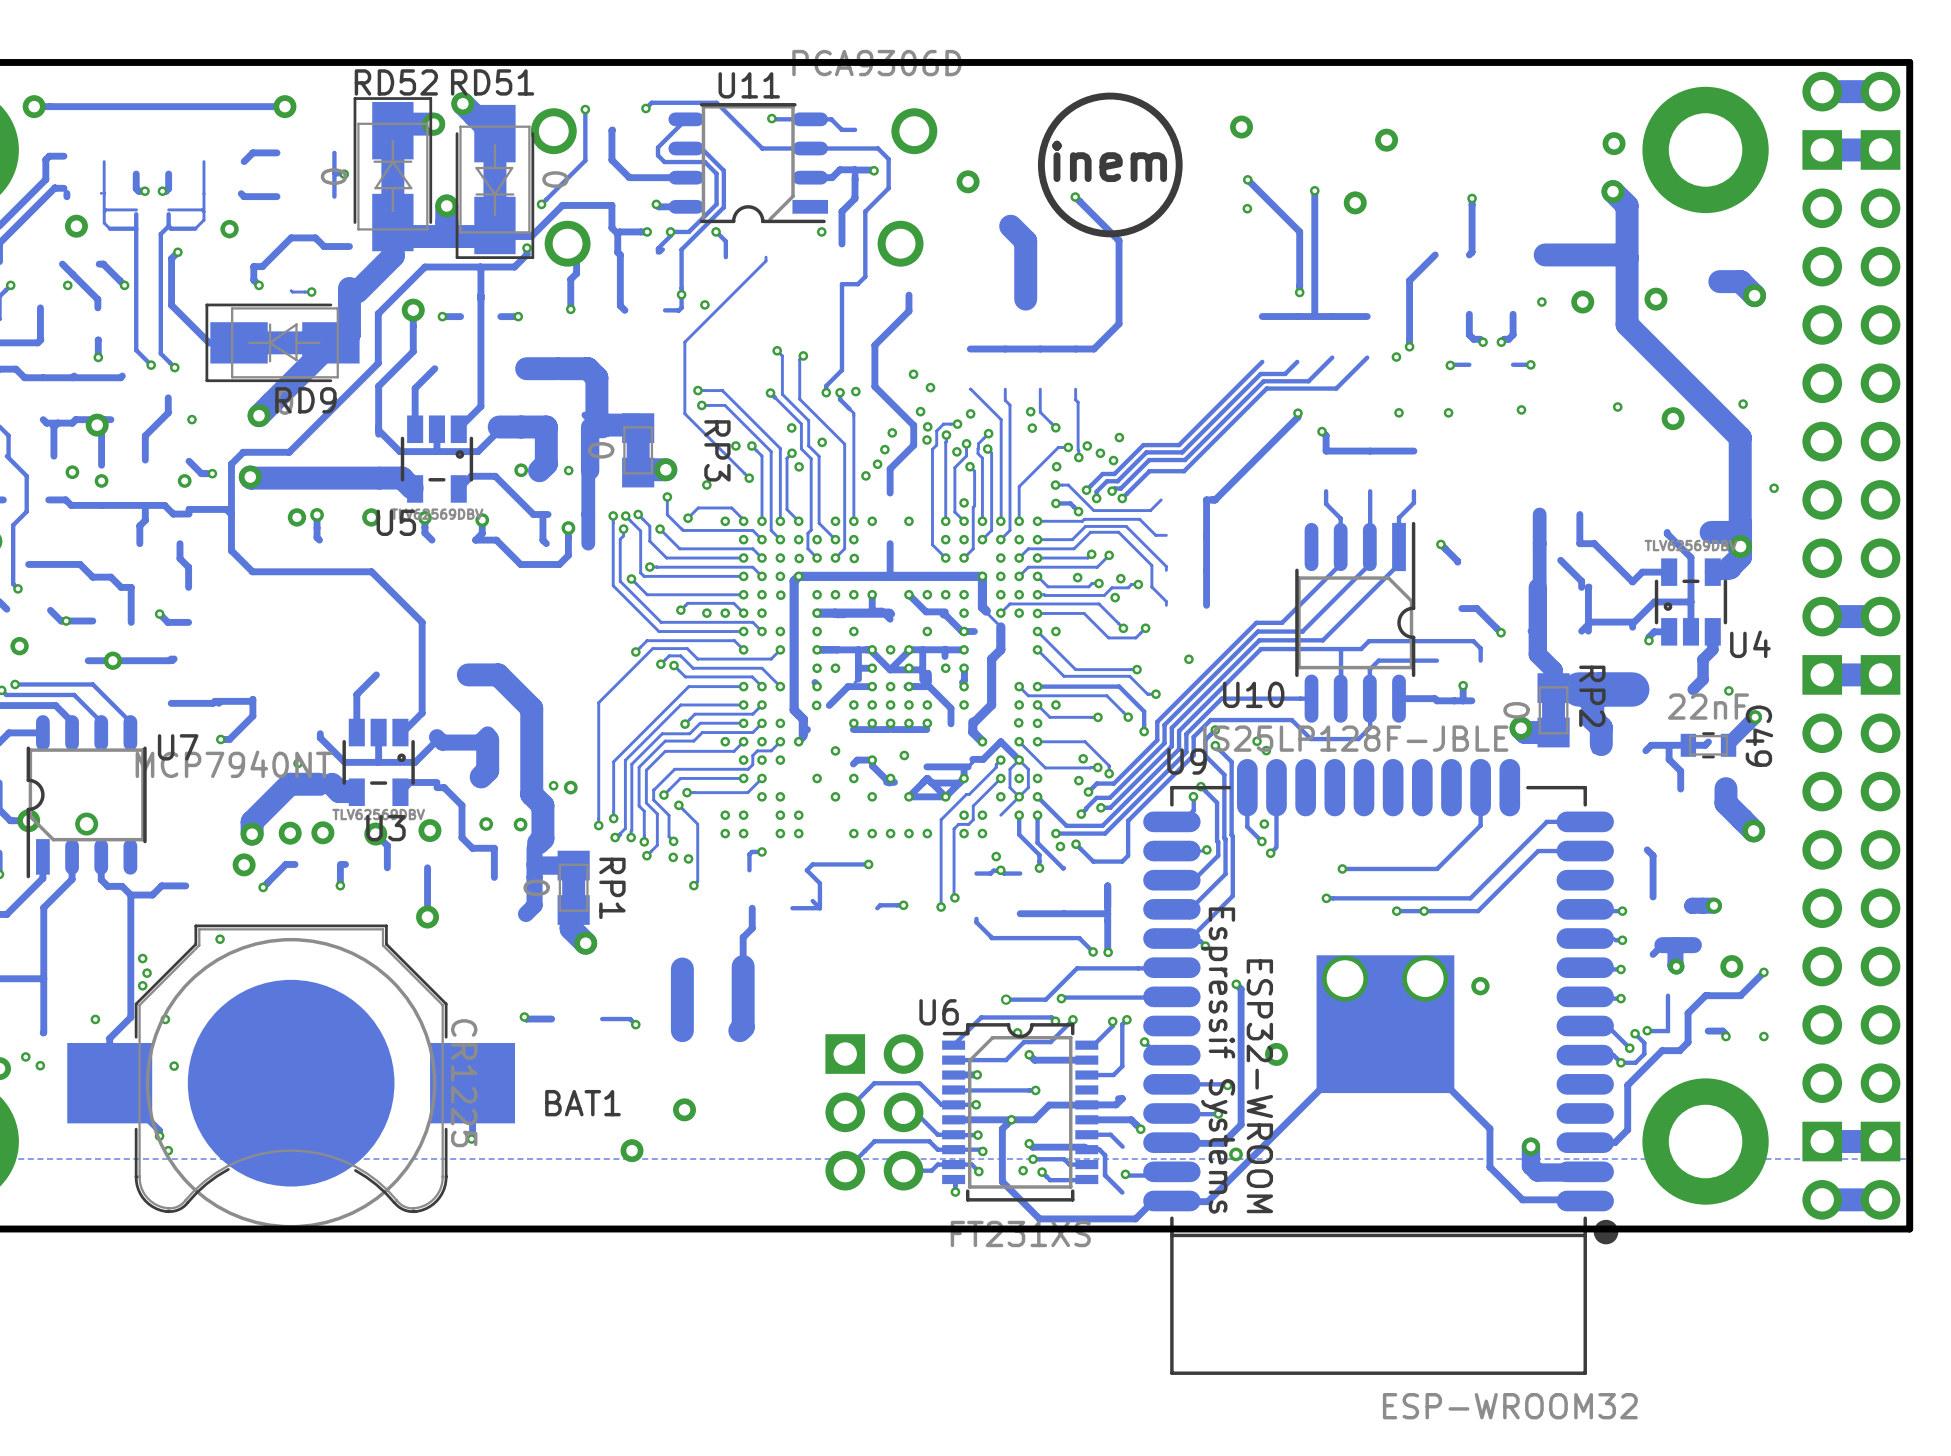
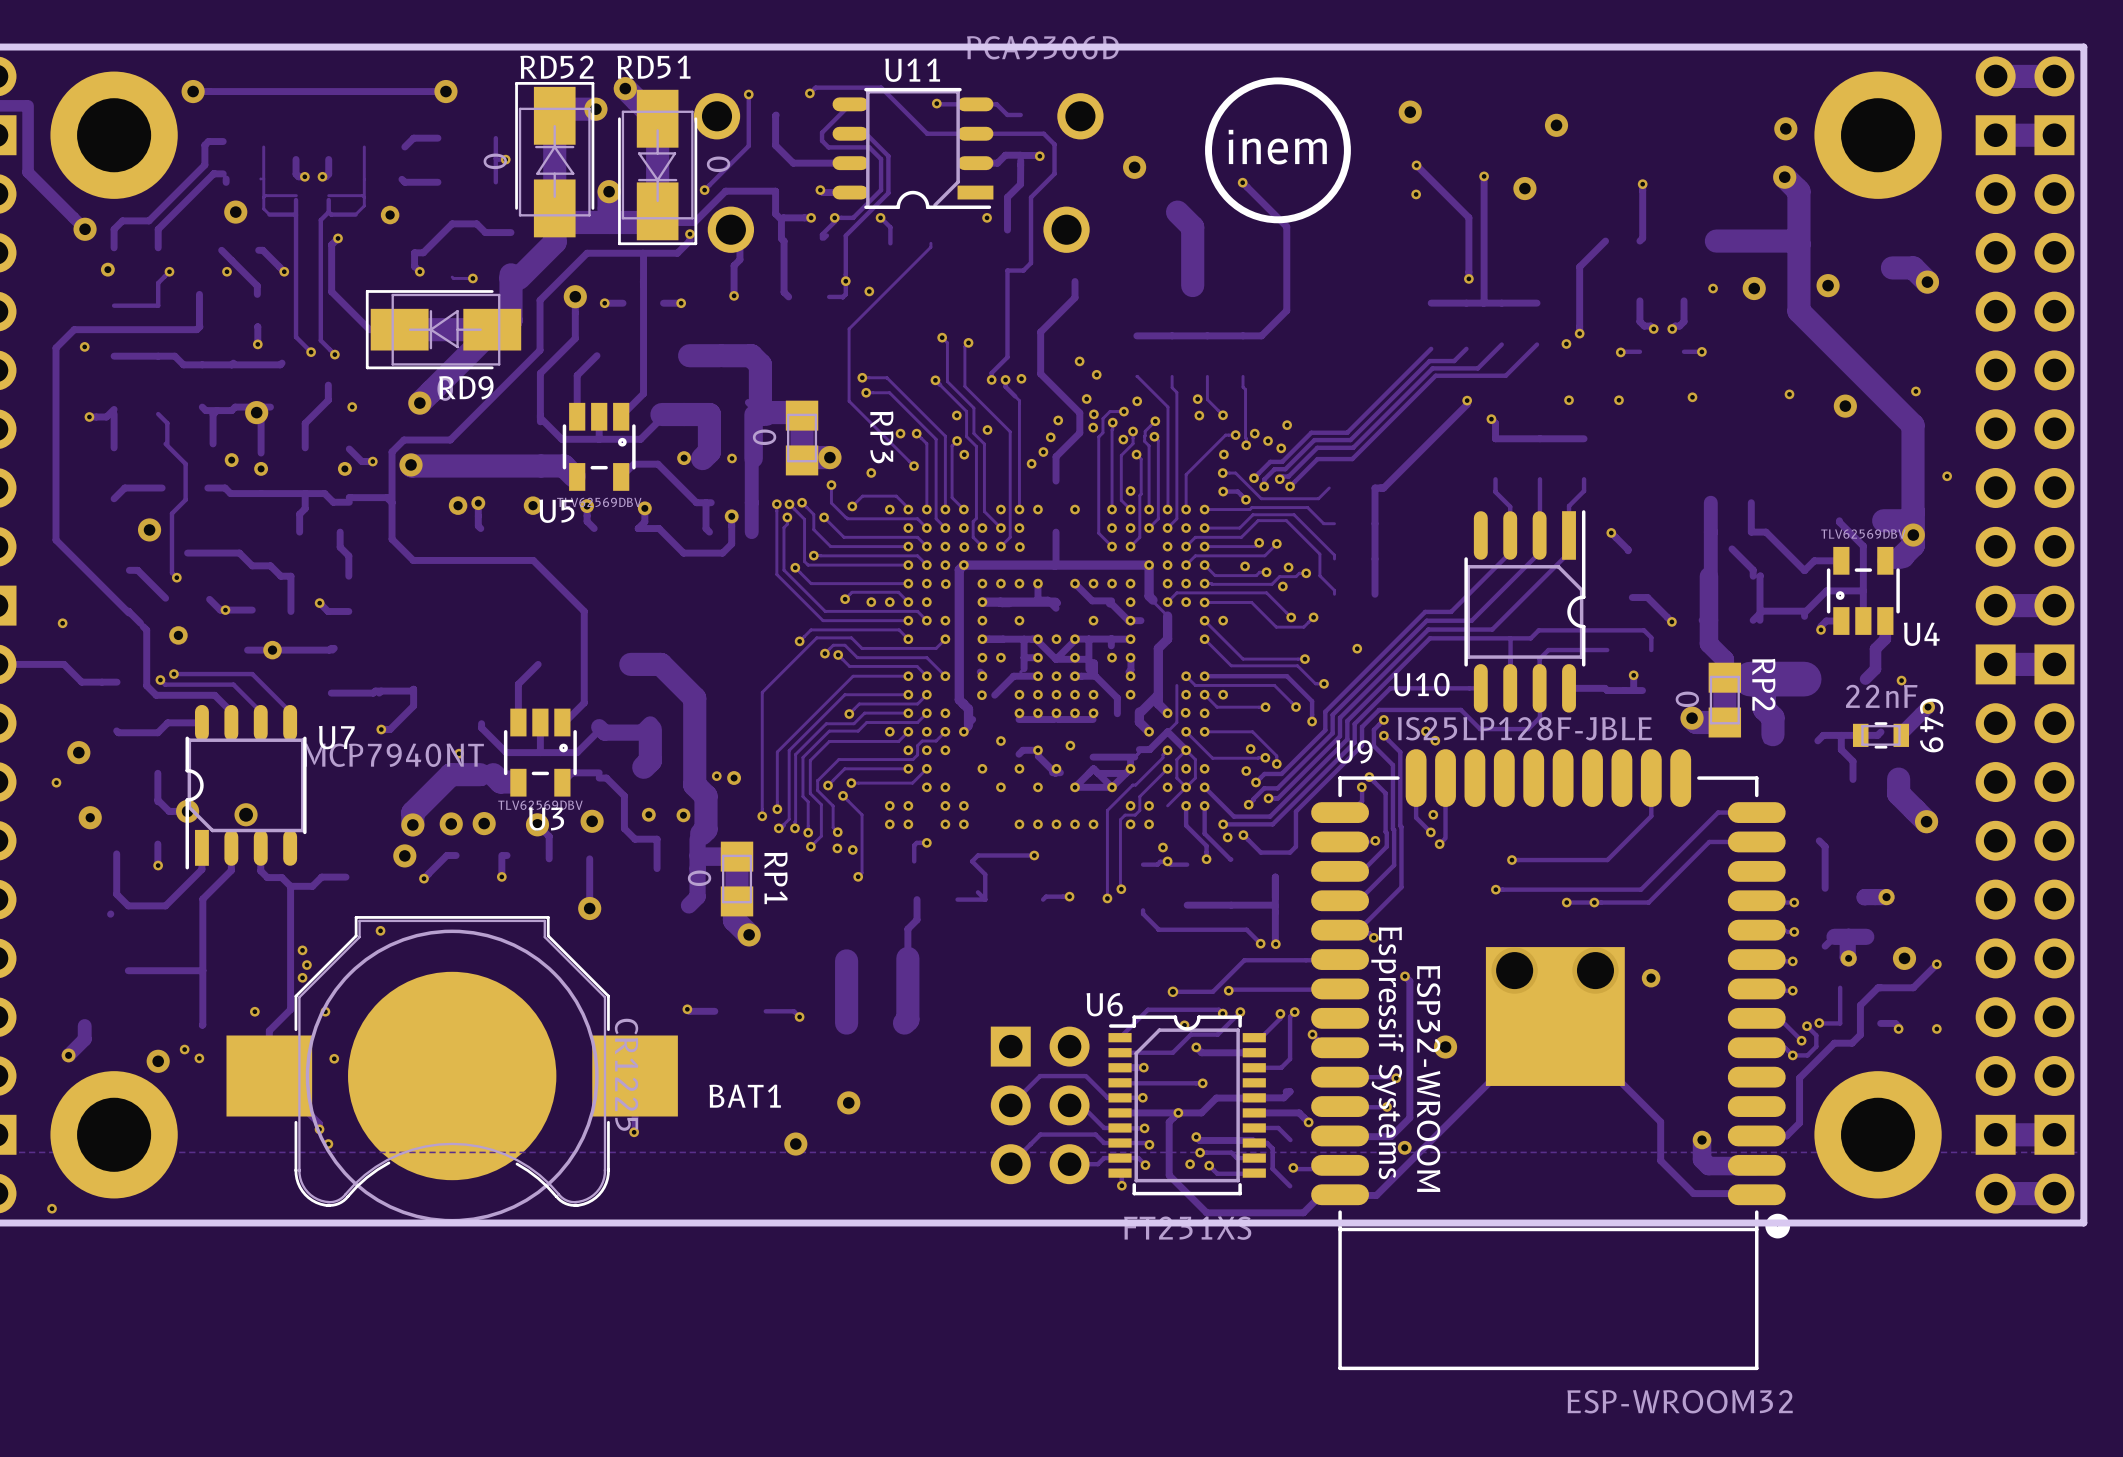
track: none -> (1176, 685) (1176, 722) (1167, 731)
track: none -> (1158, 694) (1158, 703) (1167, 713)
via: none -> (1167, 713)

